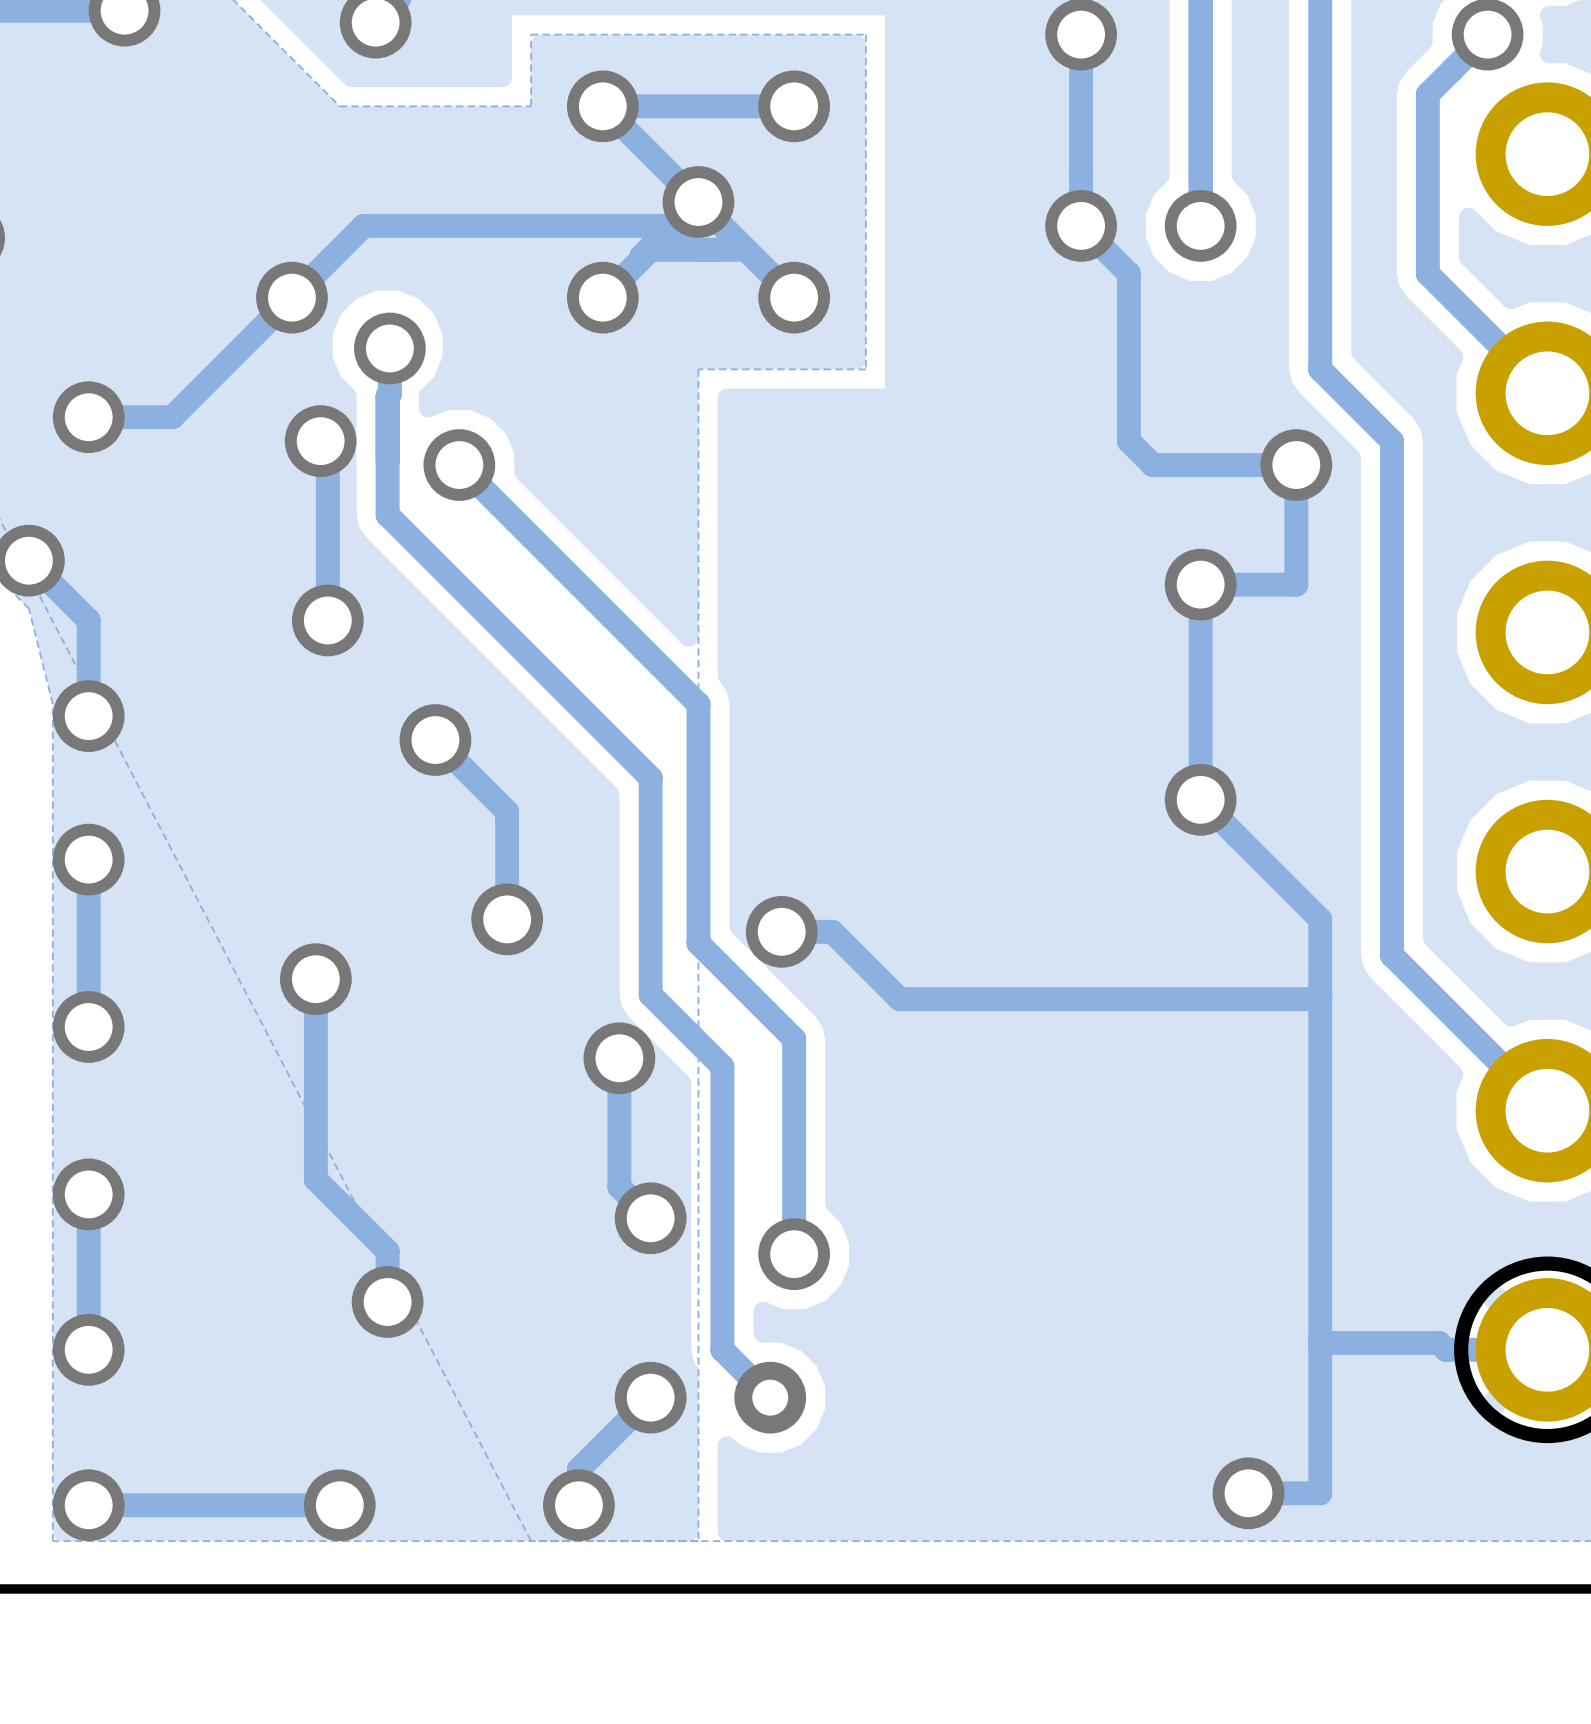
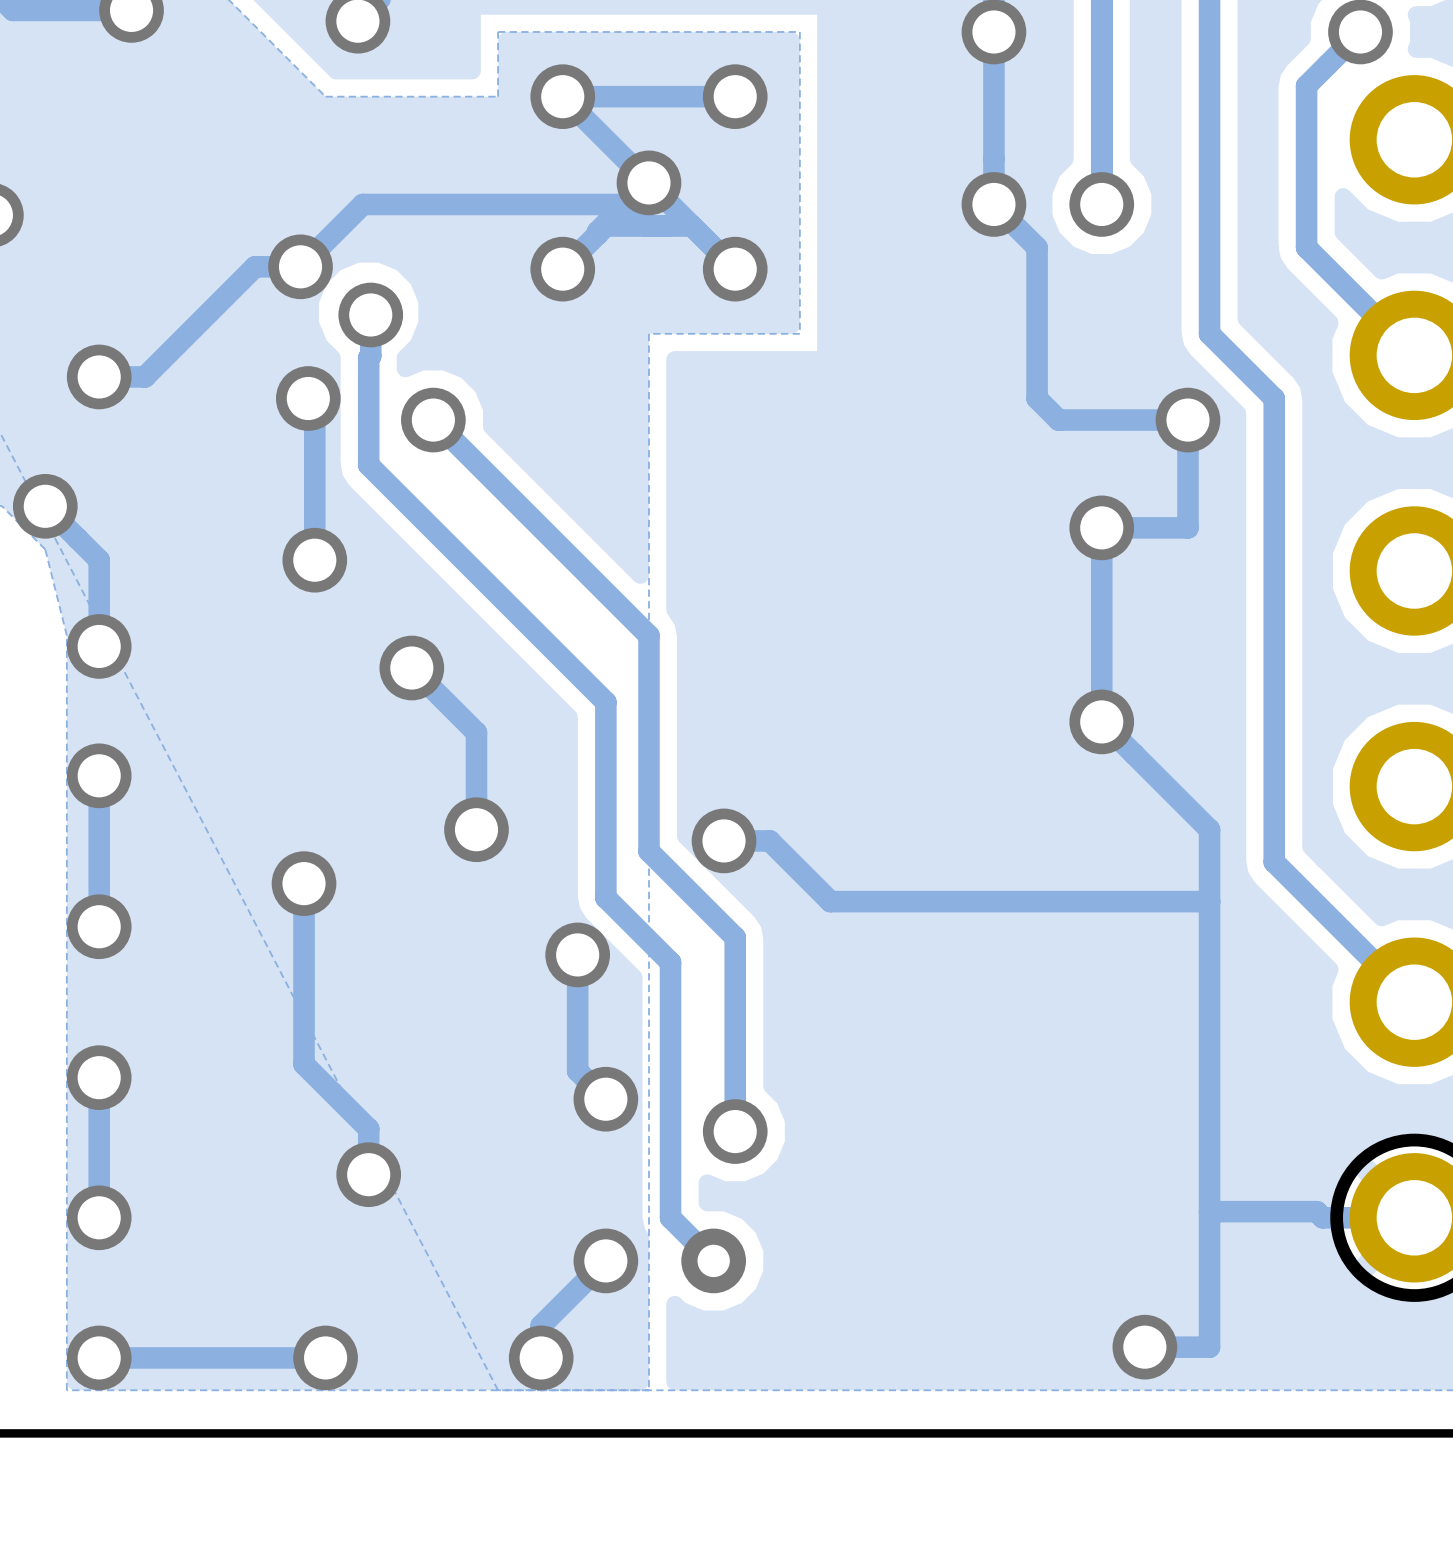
track: (381, 225) (363, 225) (172, 417) (139, 417) -> (362, 204) (300, 266) (255, 266) (144, 376)
via position: (291, 297) -> (300, 266)

